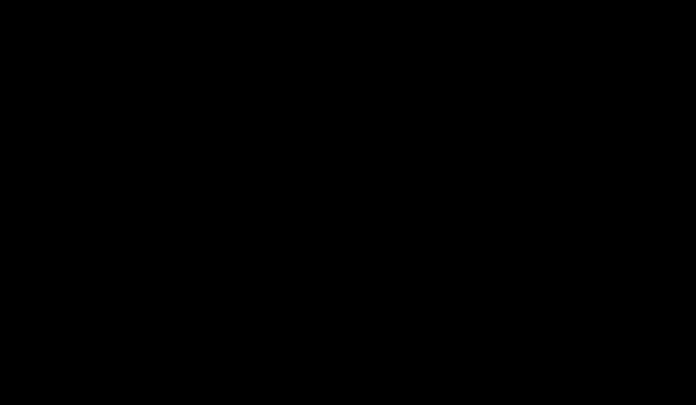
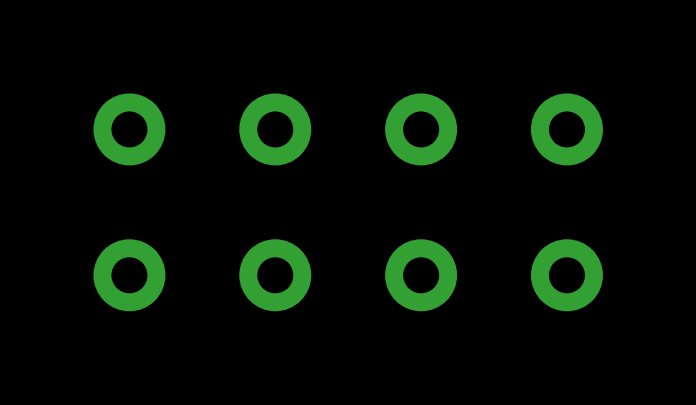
part: none -> (129, 129)
part: none -> (275, 129)
part: none -> (421, 129)
part: none -> (566, 129)
part: none -> (129, 275)
part: none -> (275, 275)
part: none -> (421, 275)
part: none -> (566, 275)

